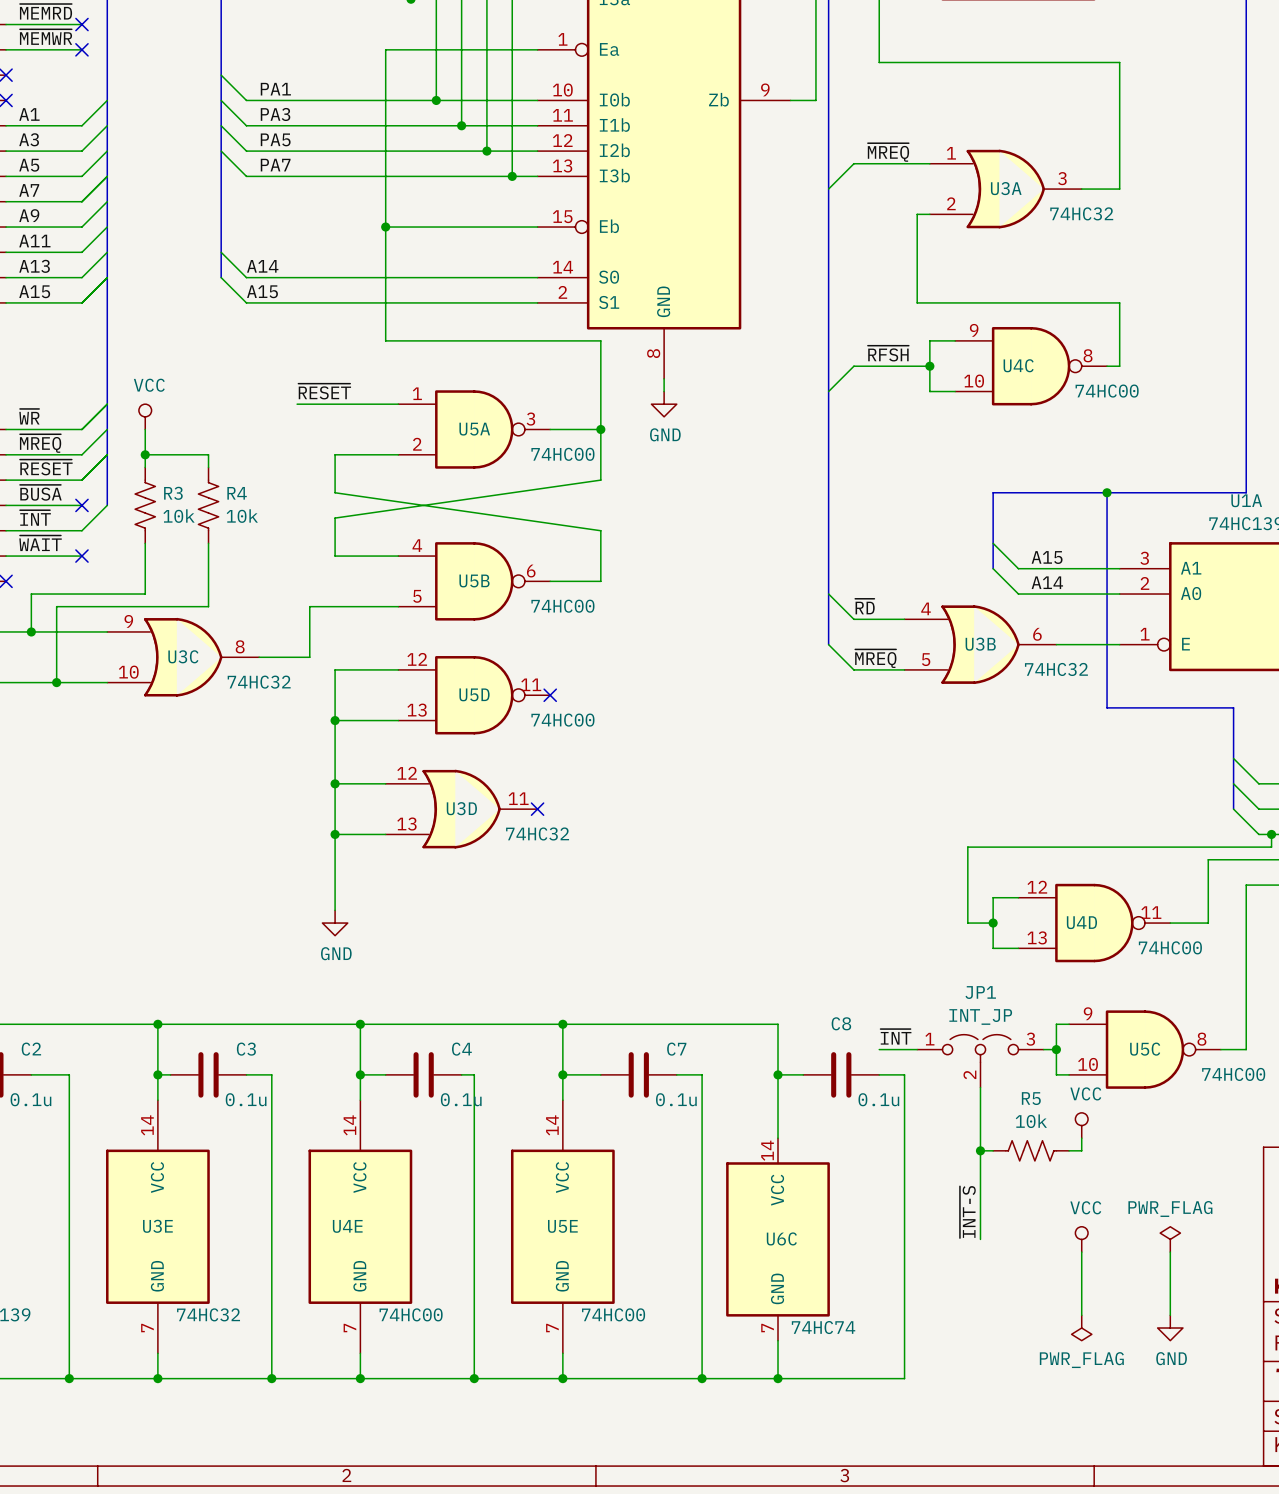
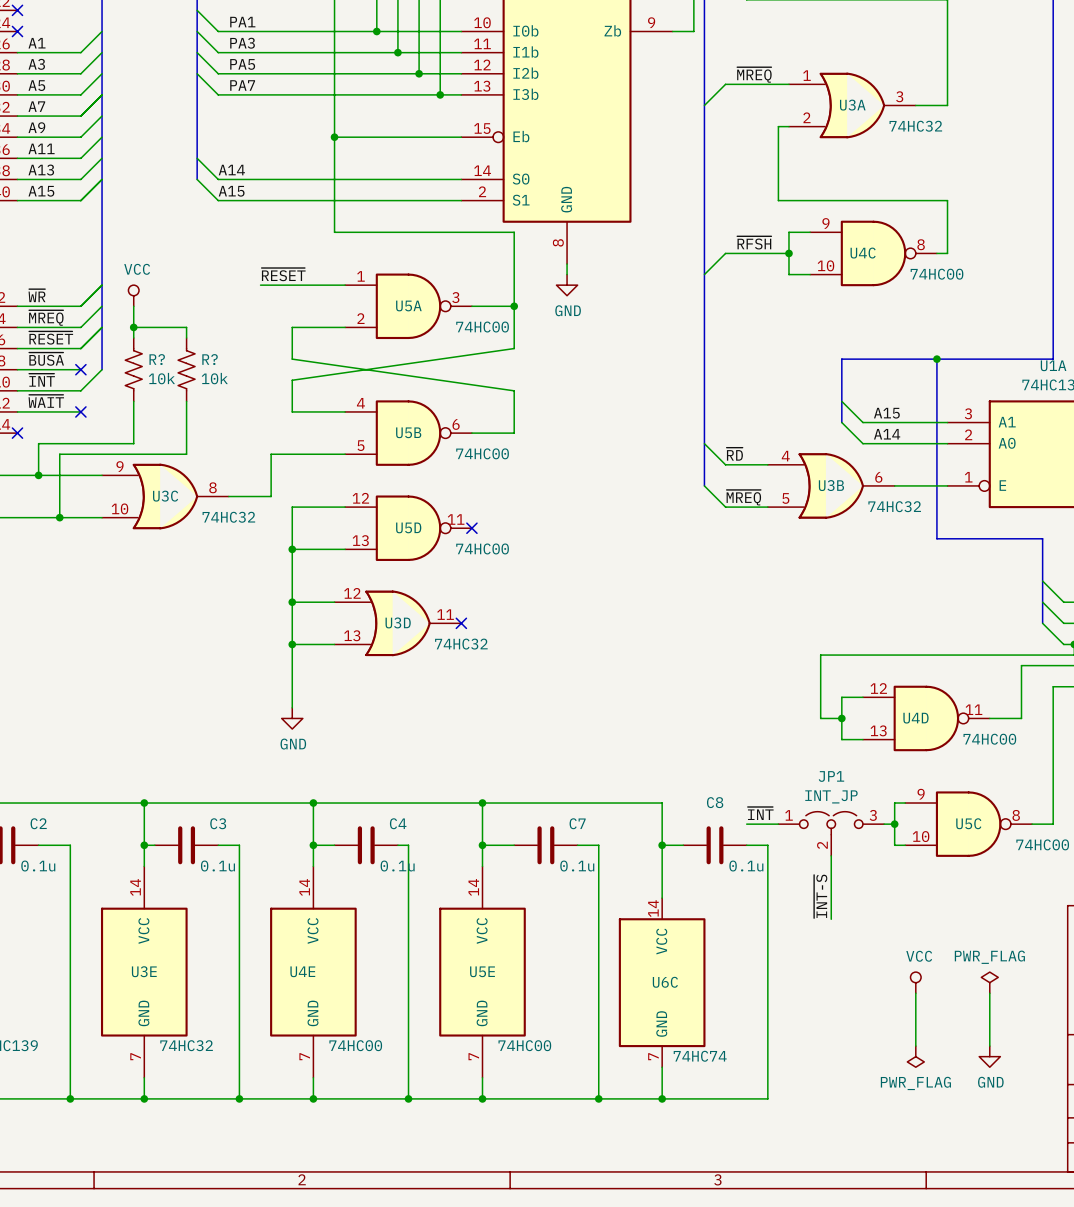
R3 name: R3 (173, 493) -> R? (157, 359)
R4 name: R4 (237, 493) -> R? (210, 359)
power symbol: VCC (1081, 1125) -> none
wire: (1081, 1138) (1081, 1150) (1069, 1150) -> none
wire: (980, 1150) (993, 1150) -> none
junction: (980, 1150) -> none
R5: 10k (1031, 1150) -> none
wire: (980, 1163) (980, 1239) -> none
label position: ~{INT-S} (967, 1212) -> ~{INT-S} (820, 896)

